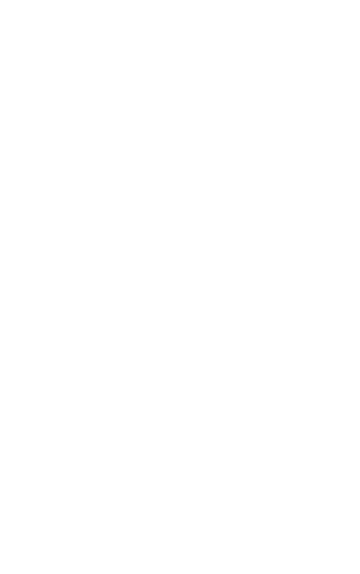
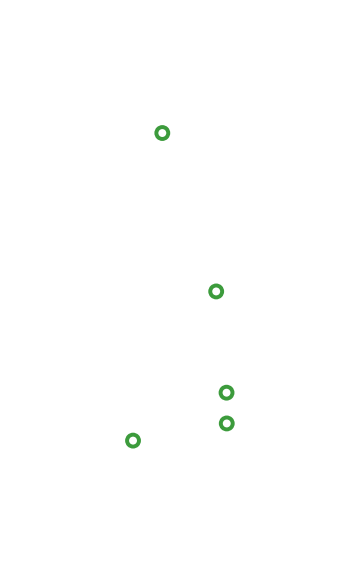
via: none -> (162, 133)
via: none -> (216, 291)
via: none -> (226, 392)
via: none -> (226, 423)
via: none -> (133, 440)

